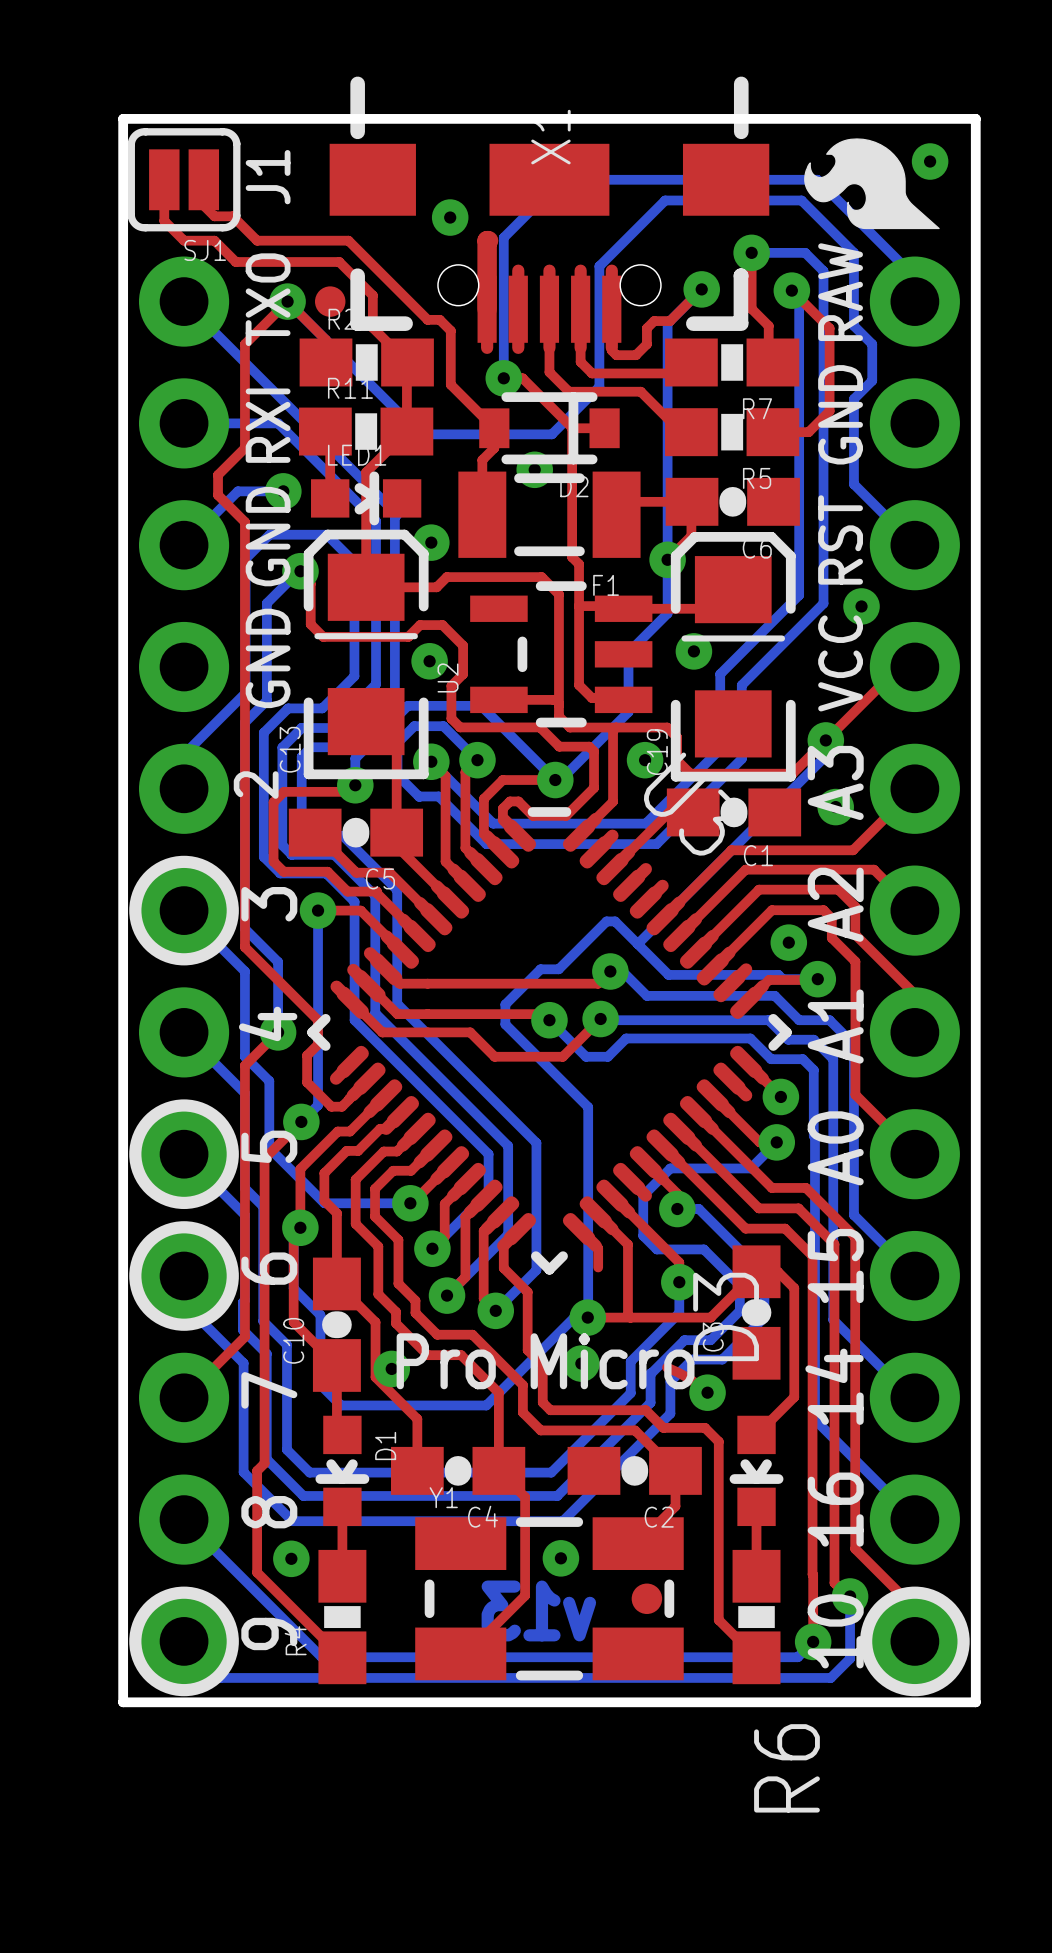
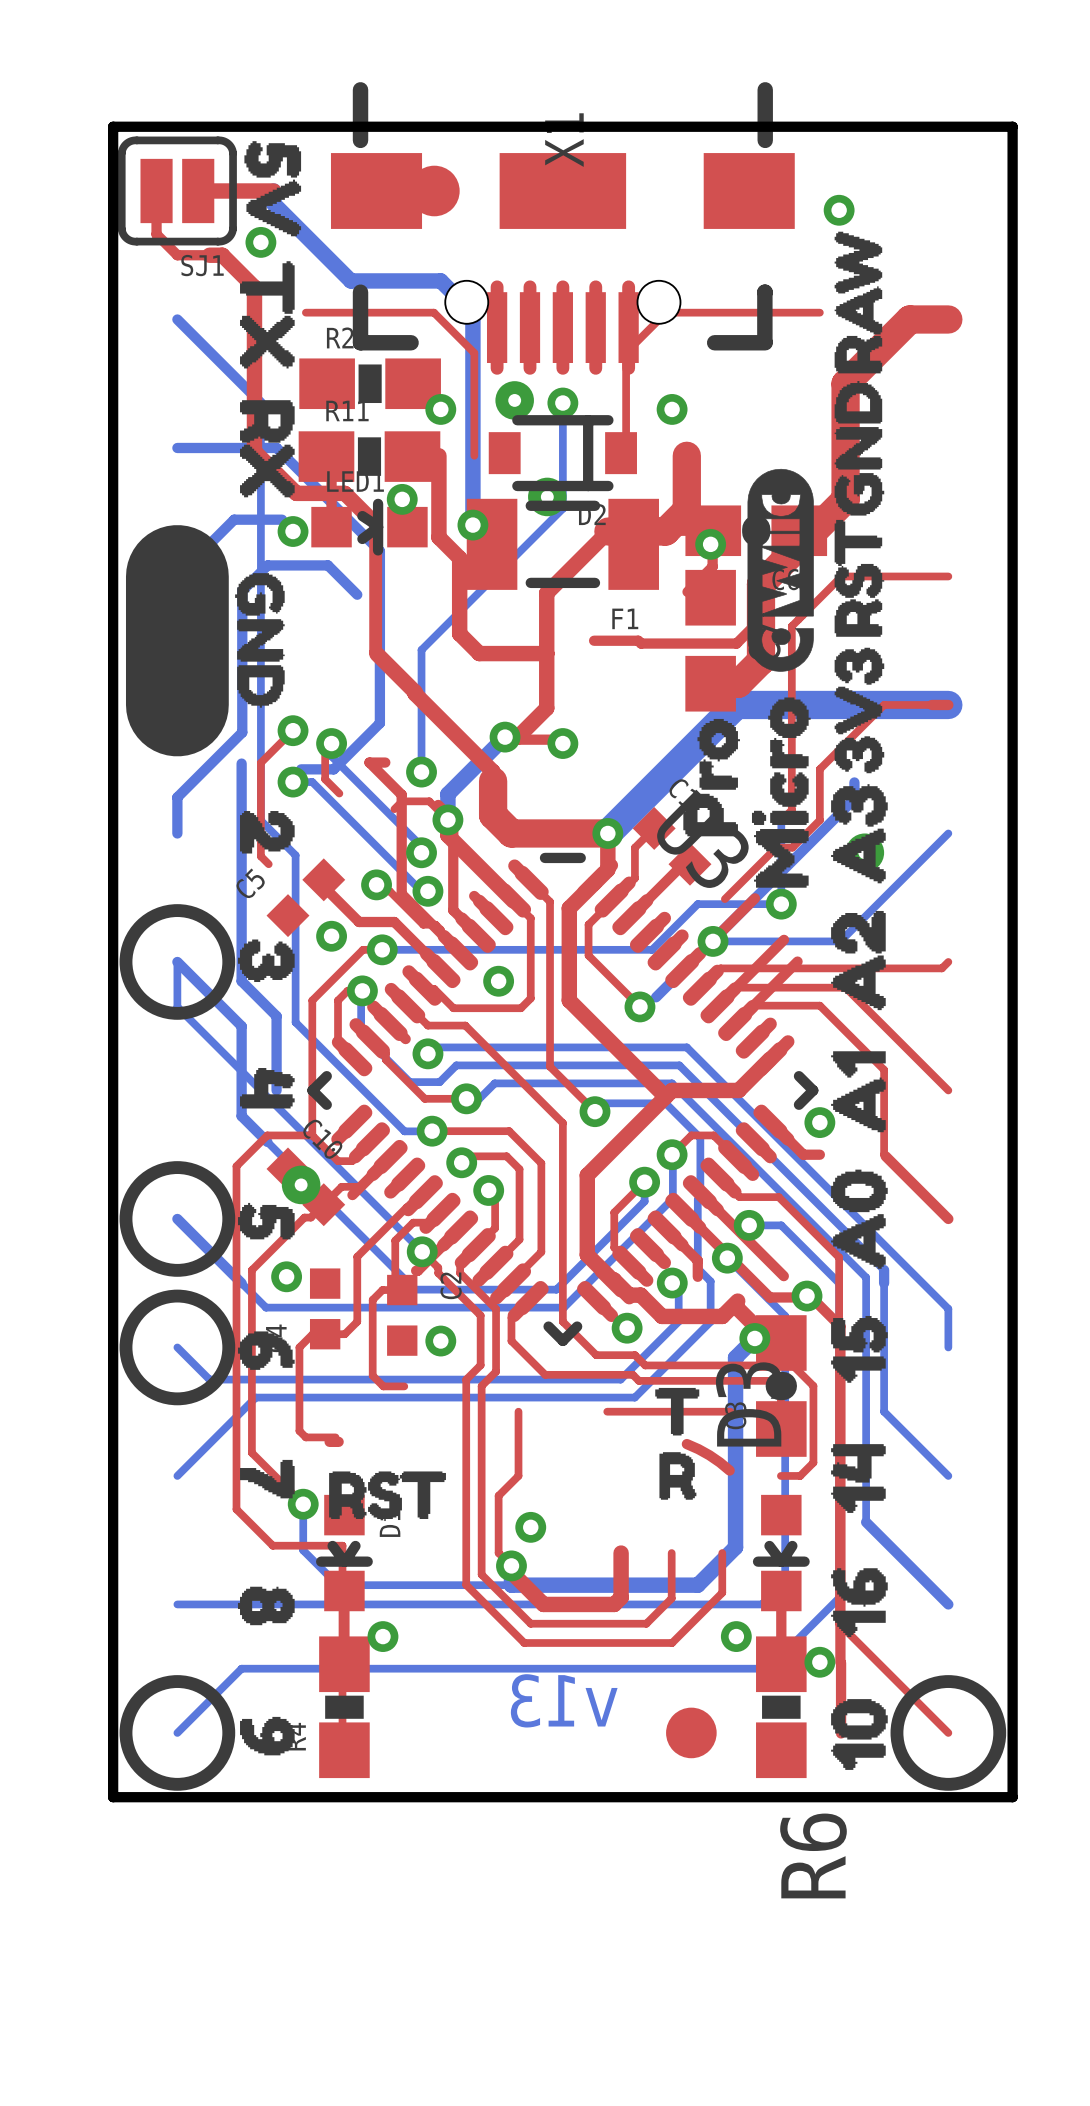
drawing: none -> [240, 141, 302, 498]
drawing: [804, 138, 940, 230] -> none
via: (930, 161) -> none
text: J1 (268, 177) -> none
top track: (203, 179) (203, 205) (214, 216) (232, 216) (257, 240) (348, 240) (427, 319) (439, 319) (450, 330) (450, 384) (494, 428) (494, 448) (482, 460) (482, 514) -> (197, 190) (273, 190)
bottom track: none -> (273, 190) (273, 203) (350, 280) (440, 280) (472, 313) (472, 525)
part: none -> (434, 190)
via: none -> (839, 210)
via: (450, 217) -> none
drawing: none -> [683, 231, 888, 1383]
via: none -> (260, 242)
top track: (214, 240) (235, 262) (339, 262) (372, 295) (372, 327) (407, 362) -> (209, 255) (222, 255) (254, 287) (254, 451) (296, 493) (344, 493) (375, 524) (375, 652) (493, 771) (493, 785) (497, 785) (493, 781) (493, 815) (511, 833) (607, 833) (607, 869) (569, 908) (569, 1000) (665, 1096)
top track: (488, 240) (487, 309) -> none
top track: (751, 252) (751, 308) (768, 325) (768, 358) (772, 362) (772, 347) -> none
bottom track: (751, 252) (805, 252) (823, 271) (823, 603) (741, 685) (741, 758) (656, 844) (486, 844) (438, 796) (419, 796) -> none
via: (751, 252) -> none
top track: (701, 289) (670, 321) (654, 321) (646, 328) (646, 344) (635, 355) (616, 355) (611, 350) (611, 309) -> none
bottom track: (701, 289) (667, 323) (667, 613) (628, 652) (628, 712) (560, 780) (555, 780) (481, 705) (407, 705) (355, 758) (355, 785) -> none
via: (701, 289) -> none
top track: (791, 290) (829, 328) (829, 411) (808, 432) (772, 432) -> none
bottom track: (791, 290) (799, 297) (799, 595) (720, 674) (720, 749) (646, 822) -> none
via: (791, 290) -> none
text: RAW (840, 292) -> none
top track: none -> (305, 312) (433, 312) (474, 353) (474, 455)
top track: none -> (819, 312) (666, 312) (626, 352) (626, 455)
text: TXO (268, 299) -> none
bottom track: (287, 301) (420, 434) (551, 434) (599, 386) (599, 266) (665, 200) (801, 200) (853, 252) (853, 325) (872, 344) (872, 380) (853, 399) (853, 484) (914, 545) -> none
via: (287, 301) -> none
part: (330, 301) -> none
top track: none -> (948, 319) (909, 319) (845, 383) (845, 499) (761, 584) (761, 661) (738, 683) (710, 683)
bottom track: (914, 301) (914, 277) (817, 179) (561, 179) (503, 237) (503, 378) -> none
top track: (549, 309) (549, 372) (568, 391) (640, 391) (681, 432) (691, 432) -> none
top track: (580, 309) (580, 361) (592, 373) (681, 373) (691, 362) -> none
top track: (326, 362) (326, 340) (287, 301) (244, 344) (244, 448) (218, 475) (218, 495) (244, 522) (244, 947) (318, 1020) (318, 1044) (307, 1055) (307, 1082) (331, 1106) (341, 1106) (352, 1095) -> none
R7: (732, 362) -> none
top track: (406, 363) (406, 431) (366, 472) (366, 587) (436, 587) (446, 577) (541, 577) (558, 594) (558, 716) (570, 727) (667, 727) (677, 737) (677, 760) (690, 773) (792, 773) (899, 666) -> (724, 899) (776, 847) (792, 847) (819, 820) (819, 769) (884, 704) (931, 704)
top track: (503, 378) (522, 378) (572, 428) (604, 428) -> none
bottom track: (263, 380) (397, 514) (394, 517) (394, 692) (340, 747) (311, 747) (301, 756) (301, 833) (304, 836) (343, 836) (397, 890) (397, 1003) (536, 1142) (536, 1270) (495, 1310) -> (260, 403) (260, 820) (295, 855) (295, 1022) (404, 1131) (431, 1131)
bottom track: none -> (562, 403) (562, 508) (421, 650) (421, 772)
via: none -> (562, 403)
via: none -> (440, 409)
via: none -> (672, 409)
text: GND (840, 414) -> none
text: RXI (268, 425) -> none
top track: (572, 428) (572, 557) (579, 564) (579, 685) (591, 698) (621, 698) (623, 699) -> none
top track: none -> (438, 455) (438, 537) (459, 558) (459, 633) (479, 653) (546, 653)
top track: none -> (686, 455) (686, 510) (665, 531) (608, 531) (546, 593) (546, 708) (517, 737) (505, 737)
R5: (732, 432) -> none
via: none -> (402, 499)
via position: (283, 491) -> (293, 531)
via: none -> (472, 525)
via: none -> (710, 544)
text: GND (268, 536) -> none
text: RST (840, 539) -> none
drawing: none -> [235, 573, 285, 708]
via: (431, 542) -> none
line: none -> (177, 576) (177, 704)
top track: none -> (948, 576) (841, 576) (791, 626) (791, 810) (781, 820)
via: (667, 559) -> none
bottom track: (354, 562) (354, 676) (322, 708) (288, 708) (263, 732) (263, 857) (280, 873) (326, 873) (354, 901) (354, 1020) (488, 1154) (488, 1192) (432, 1248) -> none
top track: (300, 571) (310, 583) (310, 624) (323, 636) (408, 636) (420, 625) (442, 625) (463, 645) (463, 674) (451, 685) (451, 718) (460, 727) (541, 727) (559, 746) (589, 746) (594, 751) (594, 787) (566, 815) (532, 815) (518, 801) (510, 801) (502, 808) (502, 818) (519, 835) -> (594, 1111) (550, 1066) (550, 901) (531, 883)
bottom track: (300, 571) (266, 603) (266, 700) (244, 722) -> none
via: (300, 571) -> none
part: none -> (710, 640)
via: (861, 606) -> none
via: (693, 651) -> none
C13: (366, 654) -> none
U2: (561, 654) -> none
C19: (733, 656) -> none
text: GND (268, 658) -> none
via: (429, 661) -> none
text: VCC (840, 663) -> none
bottom track: none -> (948, 704) (736, 704) (607, 833)
top track: none -> (293, 730) (260, 762) (260, 856) (268, 864)
via: none -> (293, 730)
bottom track: none -> (505, 737) (447, 794) (447, 819)
via: none -> (505, 737)
top track: none -> (331, 743) (325, 749) (325, 779) (339, 793)
bottom track: none -> (331, 743) (331, 756) (421, 846) (421, 852)
via: none -> (331, 743)
via: none -> (562, 743)
top track: (616, 727) (613, 730) (613, 801) (595, 818) -> none
bottom track: (301, 728) (282, 747) (282, 845) (291, 854) -> none
via: none -> (421, 772)
bottom track: none -> (293, 782) (312, 782) (421, 891) (427, 891)
via: none -> (293, 782)
via: (825, 740) -> none
top track: (477, 760) (465, 772) (465, 848) -> none
bottom track: (477, 760) (443, 726) (414, 726) (397, 743) (397, 775) (419, 796) -> none
via: (477, 760) -> none
via: (645, 760) -> none
bottom track: (431, 761) (493, 823) (646, 823) -> none
via position: (431, 761) -> (447, 819)
drawing: none -> [240, 811, 295, 854]
bottom track: none -> (781, 820) (781, 904) (697, 904) (652, 949) (382, 949)
top track: (555, 780) (502, 780) (483, 798) (483, 833) -> none
via: (555, 780) -> none
text: A3 (835, 782) -> none
top track: none -> (654, 828) (634, 847) (634, 878) (588, 924) (588, 955) (639, 1006)
text: 2 (256, 785) -> none
top track: (355, 785) (348, 791) (284, 791) (273, 802) (273, 861) (283, 871) (327, 871) (347, 891) (376, 891) (419, 935) -> (394, 809) (402, 801) (429, 801) (447, 819) (447, 835) (530, 918) (530, 998) (520, 1008) (453, 1008) (434, 989) (425, 989)
via: (355, 785) -> none
via: none -> (607, 833)
C1 footprint: [666, 788, 802, 837] -> [632, 806, 712, 886]
top track: (914, 788) (852, 850) (731, 850) -> none
bottom track: none -> (948, 833) (840, 941) (713, 941)
via: none -> (421, 852)
C5 footprint: [288, 808, 424, 857] -> [266, 858, 346, 938]
via: none -> (376, 884)
top track: none -> (382, 891) (389, 891) (423, 924) (435, 924) (440, 929) (440, 932)
via: none -> (427, 891)
bottom track: (291, 854) (334, 854) (375, 895) (375, 1013) (508, 1146) (508, 1234) (447, 1295) -> none
via: none -> (781, 904)
drawing: none -> [237, 939, 295, 983]
top track: (759, 889) (838, 889) (855, 906) (855, 934) (914, 994) (914, 1032) -> (735, 987) (845, 987) (948, 1090)
via: none -> (713, 941)
top track: none -> (382, 949) (362, 949) (312, 1000) (312, 1135)
via: none -> (382, 949)
text: 3 (269, 904) -> none
text: A2 (835, 904) -> none
bottom track: none -> (177, 961) (177, 1006) (422, 1251)
top track: (318, 910) (360, 910) (386, 936) -> none
bottom track: (318, 910) (318, 1105) (301, 1121) -> none
via position: (318, 910) -> (331, 936)
top track: (771, 910) (823, 910) (831, 918) (831, 938) (855, 961) (855, 1094) -> (753, 1005) (819, 1005) (884, 1069) (884, 1154) (885, 1156)
top track: (914, 910) (873, 869) (745, 869) (679, 935) -> (948, 961) (941, 968) (720, 968) (700, 989)
via: none -> (498, 981)
via: none -> (362, 990)
via: (788, 942) -> none
top track: none -> (408, 1006) (427, 1025) (465, 1025) (562, 1123) (562, 1321) (596, 1355) (635, 1355) (645, 1365) (792, 1365) (813, 1386) (813, 1462) (800, 1475) (780, 1475)
part: (184, 971) -> none
top track: (610, 971) (598, 983) (399, 983) -> none
bottom track: (610, 971) (622, 971) (646, 995) (774, 995) (799, 1020) (829, 1020) (853, 1044) (853, 1202) -> (362, 990) (361, 1033) (409, 1082) (439, 1082) (456, 1065) (679, 1065) (884, 1270)
via position: (610, 971) -> (639, 1006)
part: (914, 971) -> none
top track: (817, 979) (769, 980) (746, 1002) -> (754, 1338) (754, 1325) (737, 1308) (737, 1301) (722, 1316) (662, 1316) (640, 1295) (629, 1295) (612, 1279) (587, 1254) (587, 1175) (672, 1090) (738, 1090) (770, 1059)
bottom track: (817, 979) (782, 979) (778, 974) (668, 974) (615, 921) (606, 921) (558, 969) (540, 969) (505, 1004) (505, 1024) (588, 1107) (588, 1317) (574, 1317) (486, 1405) (341, 1405) (320, 1384) (320, 1315) (293, 1288) (293, 1234) (300, 1227) -> none
via: (817, 979) -> none
top track: (369, 986) (397, 1014) (543, 1014) (549, 1020) -> (373, 1041) (385, 1053) (385, 1059) (424, 1098) (466, 1098)
bottom track: none -> (427, 1053) (434, 1047) (686, 1047) (948, 1308) (948, 1347)
via: none -> (427, 1053)
top track: (352, 1002) (382, 1032) (470, 1032) (494, 1056) (562, 1056) (600, 1019) -> (355, 1059) (338, 1041) (338, 1000) (347, 990) (362, 990)
drawing: none -> [240, 1068, 295, 1109]
bottom track: (600, 1019) (768, 1020) (788, 1039) (813, 1039) (833, 1059) (833, 1319) (911, 1397) (914, 1397) -> none
via: (600, 1019) -> none
bottom track: (549, 1020) (586, 1056) (607, 1056) (626, 1038) (750, 1038) (771, 1059) (802, 1059) (813, 1070) (814, 1419) (836, 1441) -> (466, 1098) (479, 1098) (494, 1083) (671, 1083) (866, 1277) (866, 1522)
via position: (549, 1020) -> (594, 1111)
text: 4 (268, 1023) -> none
text: A1 (835, 1026) -> none
bottom track: (184, 1032) (244, 1093) (244, 1188) (263, 1206) (263, 1321) (286, 1344) (286, 1449) (309, 1472) (551, 1472) (630, 1393) (630, 1361) (679, 1313) (679, 1282) -> none
top track: (278, 1032) (244, 1065) (244, 1336) (184, 1397) -> none
via: (278, 1032) -> none
via: none -> (466, 1098)
bottom track: none -> (594, 1111) (603, 1103) (665, 1103) (700, 1138) (697, 1268) (710, 1281) (710, 1321) (634, 1397) (255, 1397) (177, 1475)
via: none -> (819, 1122)
top track: none -> (432, 1131) (509, 1131) (541, 1163) (541, 1252) (513, 1279)
via: none -> (432, 1131)
top track: none -> (312, 1135) (338, 1161) (352, 1161) (373, 1139)
top track: none -> (312, 1135) (267, 1135) (236, 1166) (236, 1509) (272, 1545) (342, 1545) (342, 1753)
bottom track: (269, 1081) (269, 1148) (324, 1203) (410, 1203) -> (267, 1141) (415, 1289) (556, 1289) (644, 1201) (644, 1182)
top track: none -> (672, 1154) (691, 1135) (713, 1135) (735, 1156)
via: none -> (672, 1154)
top track: none -> (390, 1156) (360, 1186) (341, 1186) (310, 1217) (304, 1217) (251, 1270) (251, 1452) (303, 1504)
via: (780, 1096) -> none
top track: none -> (461, 1162) (468, 1156) (506, 1156) (519, 1169) (519, 1239) (496, 1262)
via: none -> (461, 1162)
top track: (696, 1112) (771, 1187) (805, 1187) (855, 1237) (855, 1548) (914, 1608) (914, 1641) -> (717, 1174) (739, 1197) (778, 1197) (839, 1257) (839, 1623) (948, 1732)
top track: (729, 1112) (759, 1142) (776, 1142) -> none
top track: none -> (644, 1182) (614, 1212) (614, 1247) (629, 1262)
via: none -> (644, 1182)
top track: (301, 1121) (264, 1158) (264, 1463) (257, 1470) (257, 1572) (342, 1657) -> none
top track: none -> (488, 1190) (495, 1196) (495, 1228) (460, 1263) (460, 1273) (496, 1309) (496, 1371) (481, 1386) (481, 1574) (530, 1623) (646, 1623) (671, 1598) (671, 1553)
via: none -> (488, 1190)
top track: (386, 1128) (380, 1128) (358, 1150) (346, 1150) (324, 1173) (324, 1200) (336, 1213) (336, 1283) (345, 1292) -> none
top track: none -> (425, 1191) (410, 1207) (406, 1207) (357, 1256) (357, 1321) (344, 1334) (312, 1334) (299, 1347) (299, 1430) (305, 1437) (335, 1437)
top track: (350, 1131) (337, 1131) (300, 1168) (300, 1227) (293, 1234) (293, 1322) (336, 1365) (336, 1429) (342, 1434) -> none
drawing: none -> [237, 1202, 295, 1240]
bottom track: (776, 1142) (750, 1168) (670, 1168) (643, 1195) (643, 1235) (656, 1249) (703, 1249) (739, 1285) (739, 1310) (710, 1340) (684, 1340) (651, 1373) -> none
via: (776, 1142) -> none
top track: (402, 1145) (396, 1151) (383, 1151) (355, 1179) (355, 1223) (378, 1246) (378, 1294) (395, 1311) (395, 1323) (427, 1355) (461, 1355) (498, 1392) (498, 1470) (525, 1497) (525, 1595) (466, 1653) (460, 1653) -> none
top track: none -> (443, 1209) (430, 1222) (413, 1222) (395, 1240) (395, 1283) (402, 1290) (382, 1290) (372, 1299) (372, 1375) (383, 1386) (404, 1386)
text: 5 (269, 1146) -> none
text: A0 (835, 1148) -> none
via: none -> (749, 1225)
top track: (419, 1162) (411, 1170) (393, 1170) (375, 1188) (375, 1216) (398, 1239) (398, 1283) (415, 1300) (415, 1312) (437, 1334) (472, 1334) (522, 1385) (522, 1412) (540, 1430) (635, 1430) (675, 1470) (675, 1506) (638, 1543) -> none
top track: none -> (461, 1227) (437, 1251) (422, 1251) (438, 1267) (438, 1273) (480, 1315) (480, 1365) (466, 1379) (466, 1584) (524, 1642) (672, 1642) (722, 1592) (722, 1553)
via: none -> (727, 1258)
top track: (453, 1195) (444, 1204) (444, 1236) (432, 1248) -> none
via position: (410, 1203) -> (422, 1251)
top track: (758, 1208) (798, 1208) (834, 1244) (834, 1582) (850, 1596) -> none
bottom track: (677, 1209) (698, 1209) (764, 1274) (764, 1317) (722, 1359) (692, 1359) (670, 1381) (670, 1413) (562, 1521) (292, 1521) (243, 1472) (243, 1363) (184, 1303) (184, 1276) -> (672, 1283) (678, 1289) (678, 1321) (620, 1379) (209, 1379) (177, 1347)
via: (677, 1209) -> none
top track: (469, 1212) (465, 1216) (465, 1277) (447, 1295) -> none
top track: (629, 1212) (679, 1262) (679, 1282) -> none
via: none -> (672, 1283)
bottom track: (244, 1215) (244, 1300) (242, 1302) (242, 1329) (266, 1353) (266, 1459) (303, 1495) (557, 1495) (650, 1402) (650, 1373) -> (241, 1283) (266, 1307) (563, 1307) (672, 1198) (672, 1154)
bottom track: (853, 1215) (914, 1276) -> (884, 1283) (884, 1411) (948, 1475)
via position: (300, 1227) -> (286, 1276)
via: none -> (807, 1296)
top track: none -> (531, 1297) (511, 1317) (511, 1341) (545, 1374) (632, 1374) (638, 1380) (776, 1380) (780, 1385) (780, 1411)
top track: (486, 1229) (483, 1230) (483, 1298) (495, 1310) -> none
top track: (612, 1229) (627, 1244) (627, 1314) (630, 1317) -> none
top track: (503, 1245) (503, 1268) (527, 1292) (527, 1350) (542, 1365) (542, 1402) (550, 1410) (645, 1410) (663, 1427) (705, 1427) (718, 1441) (718, 1620) (756, 1657) -> none
top track: (595, 1245) (598, 1248) (598, 1267) -> none
via: (432, 1248) -> none
C10 footprint: [312, 1257, 361, 1392] -> [266, 1147, 346, 1227]
via: none -> (627, 1328)
drawing: none -> [237, 1331, 295, 1370]
text: 15 (835, 1265) -> none
bottom track: none -> (754, 1338) (735, 1357) (735, 1547) (697, 1585) (511, 1585)
via: none -> (754, 1338)
text: 6 (269, 1268) -> none
via: none -> (440, 1341)
top track: (744, 1271) (777, 1271) (794, 1288) (794, 1397) (756, 1434) -> none
top track: (756, 1271) (710, 1317) (587, 1317) -> none
via: (679, 1282) -> none
top track: (345, 1292) (375, 1322) (375, 1377) (417, 1419) (417, 1470) -> none
via: (447, 1295) -> none
via: (495, 1310) -> none
drawing: none -> [655, 1387, 700, 1500]
via: (587, 1317) -> none
top track: none -> (518, 1411) (518, 1475) (498, 1495) (498, 1553) (511, 1565) (511, 1572) (543, 1604) (614, 1604) (621, 1597) (621, 1553)
top track: none -> (607, 1411) (730, 1411)
text: Pro (446, 1361) -> none
text: Micro (612, 1361) -> none
via: (581, 1363) -> none
drawing: none -> [831, 1444, 888, 1638]
via: (391, 1368) -> none
drawing: none -> [240, 1459, 446, 1522]
text: 14 (834, 1386) -> none
text: 7 (269, 1390) -> none
via: (707, 1392) -> none
bottom track: none -> (303, 1504) (303, 1550) (338, 1585) (511, 1585)
via: none -> (303, 1504)
C4 footprint: [390, 1446, 526, 1495] -> [309, 1268, 341, 1350]
via: none -> (530, 1527)
C2 footprint: [567, 1446, 702, 1495] -> [387, 1274, 418, 1356]
via: none -> (511, 1565)
drawing: none -> [237, 1586, 295, 1626]
text: 16 (835, 1509) -> none
text: 8 (269, 1512) -> none
bottom track: (184, 1519) (321, 1657) (797, 1657) (813, 1641) -> (177, 1604) (762, 1604) (785, 1581) (785, 1315) (727, 1258)
via: none -> (382, 1636)
via: none -> (736, 1636)
via: (291, 1558) -> none
via: (560, 1558) -> none
via: none -> (819, 1662)
bottom track: (850, 1596) (850, 1658) (830, 1677) (220, 1677) (184, 1641) -> (749, 1225) (781, 1225) (839, 1283) (839, 1598) (768, 1668) (241, 1668) (177, 1732)
via: (850, 1596) -> none
Y1: (549, 1598) -> none
part: (646, 1598) -> none
drawing: none -> [831, 1699, 888, 1770]
drawing: none -> [240, 1716, 295, 1756]
text: 10 (835, 1631) -> none
text: 9 (269, 1633) -> none
part: none -> (691, 1732)
via: (813, 1641) -> none

